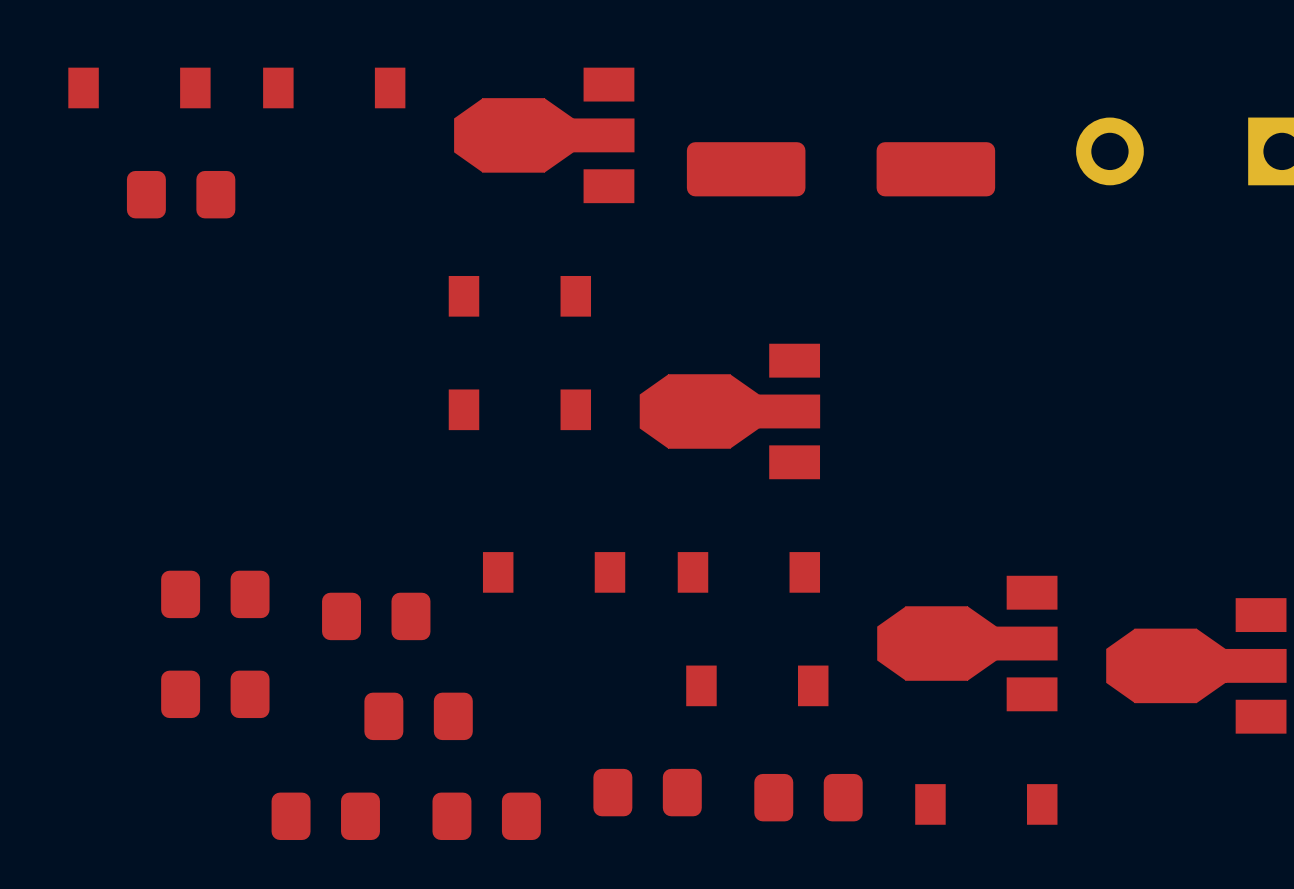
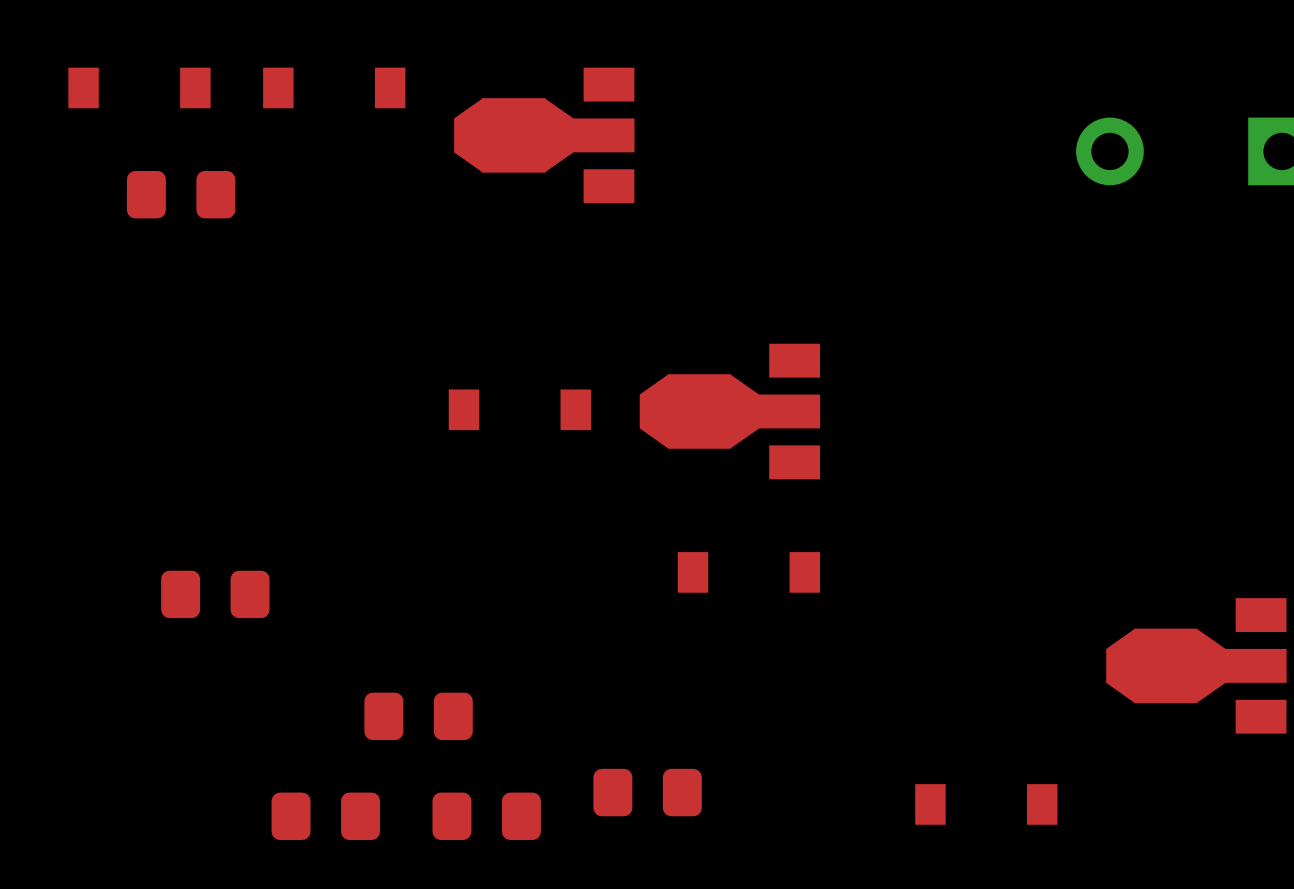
part: (841, 169) -> none
part: (519, 296) -> none
part: (554, 572) -> none
part: (376, 616) -> none
part: (967, 643) -> none
part: (757, 685) -> none
part: (215, 694) -> none
part: (808, 797) -> none

